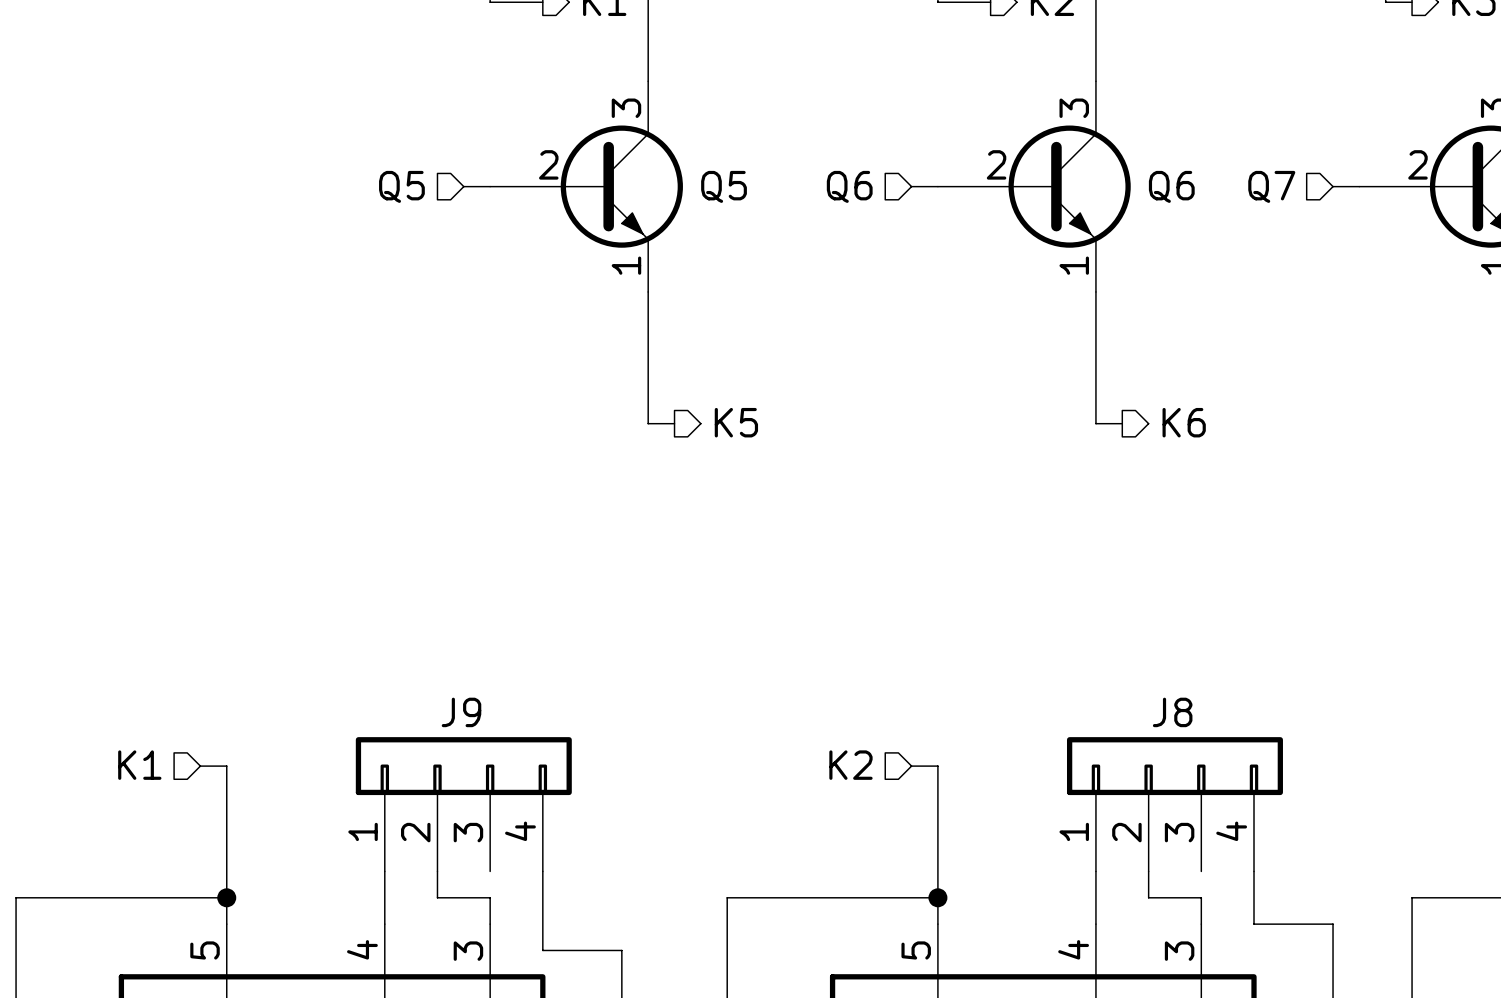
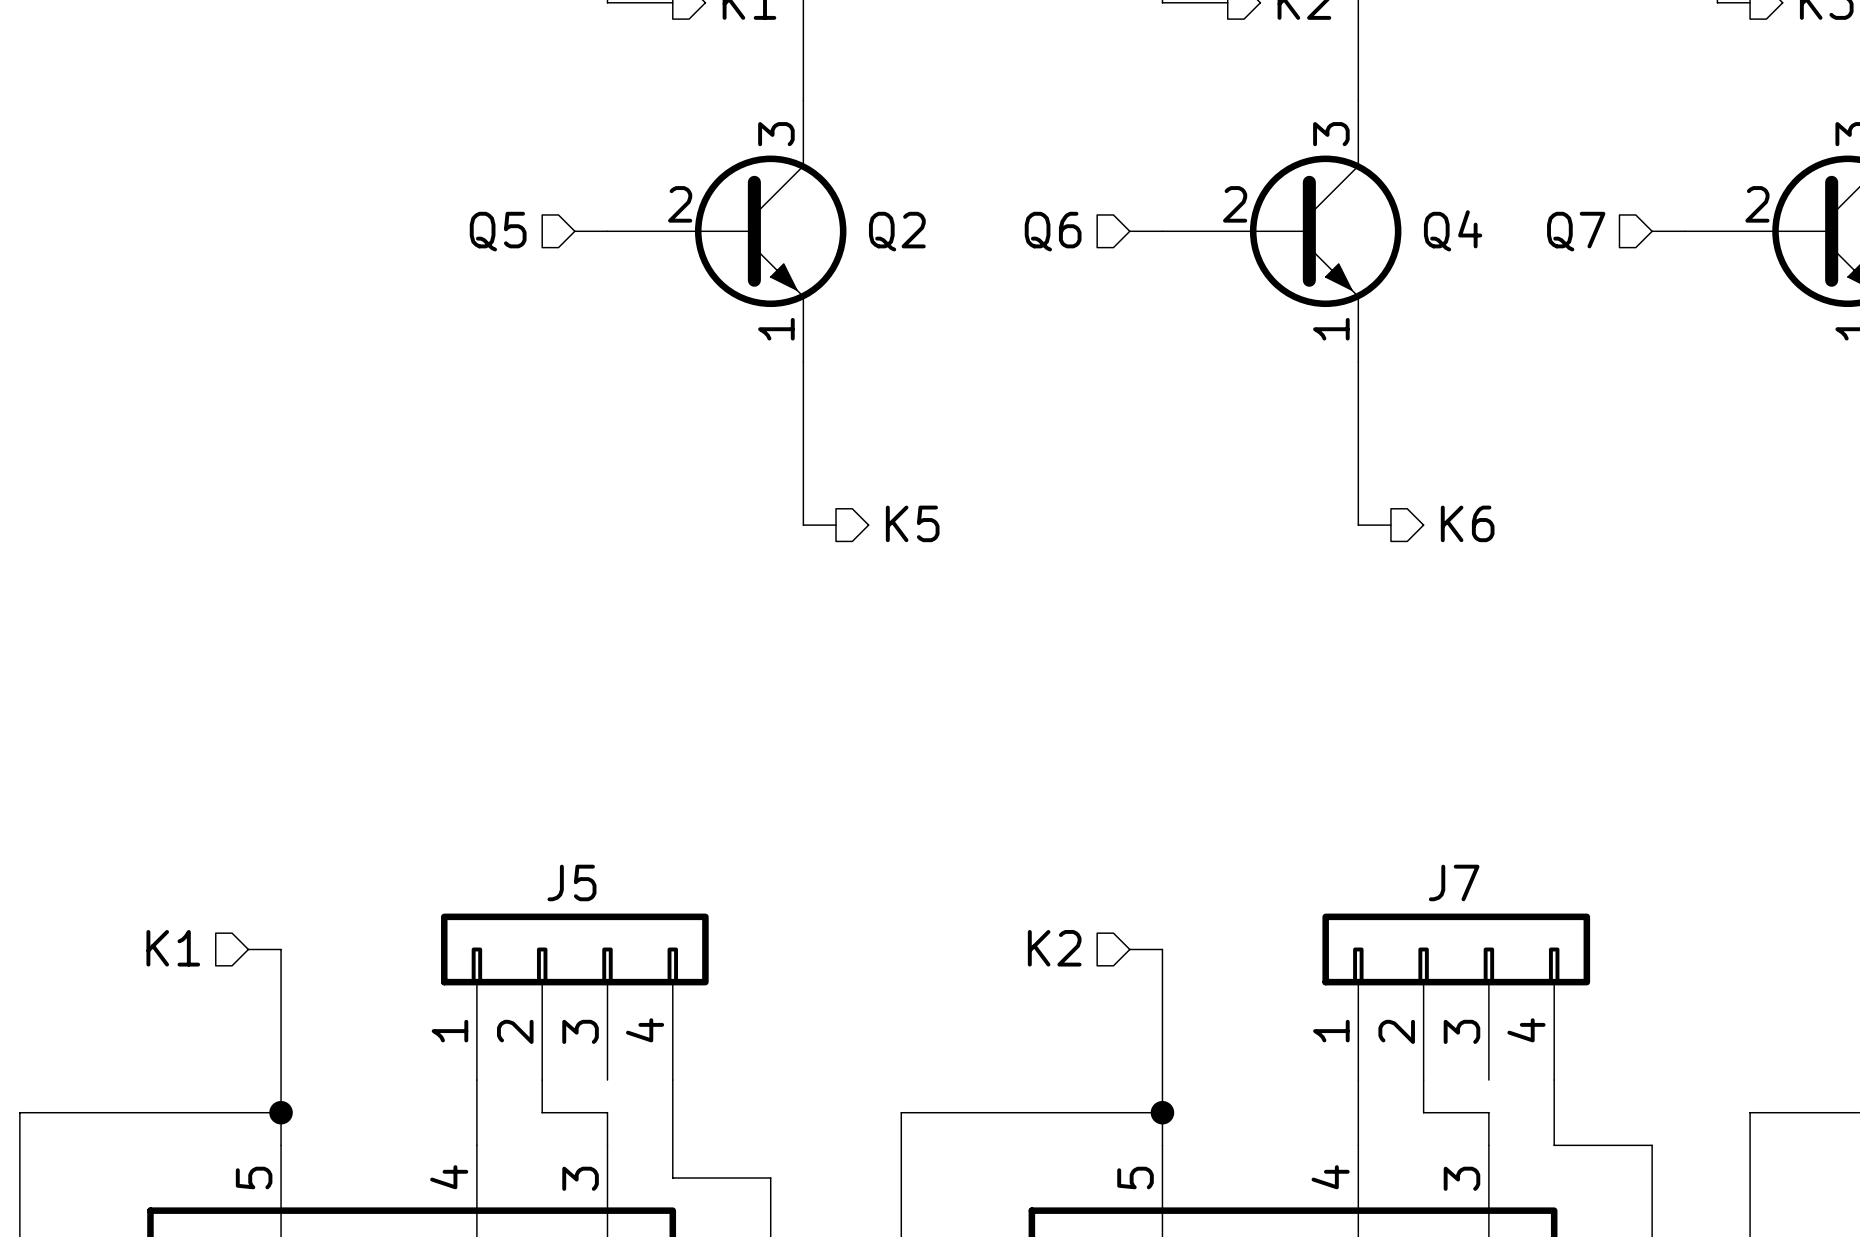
Q5 name: Q5 (724, 186) -> Q2 (897, 231)
Q6 name: Q6 (1171, 186) -> Q4 (1453, 230)
J9 name: J9 (461, 712) -> J5 (571, 882)
J8 name: J8 (1172, 712) -> J7 (1454, 882)

